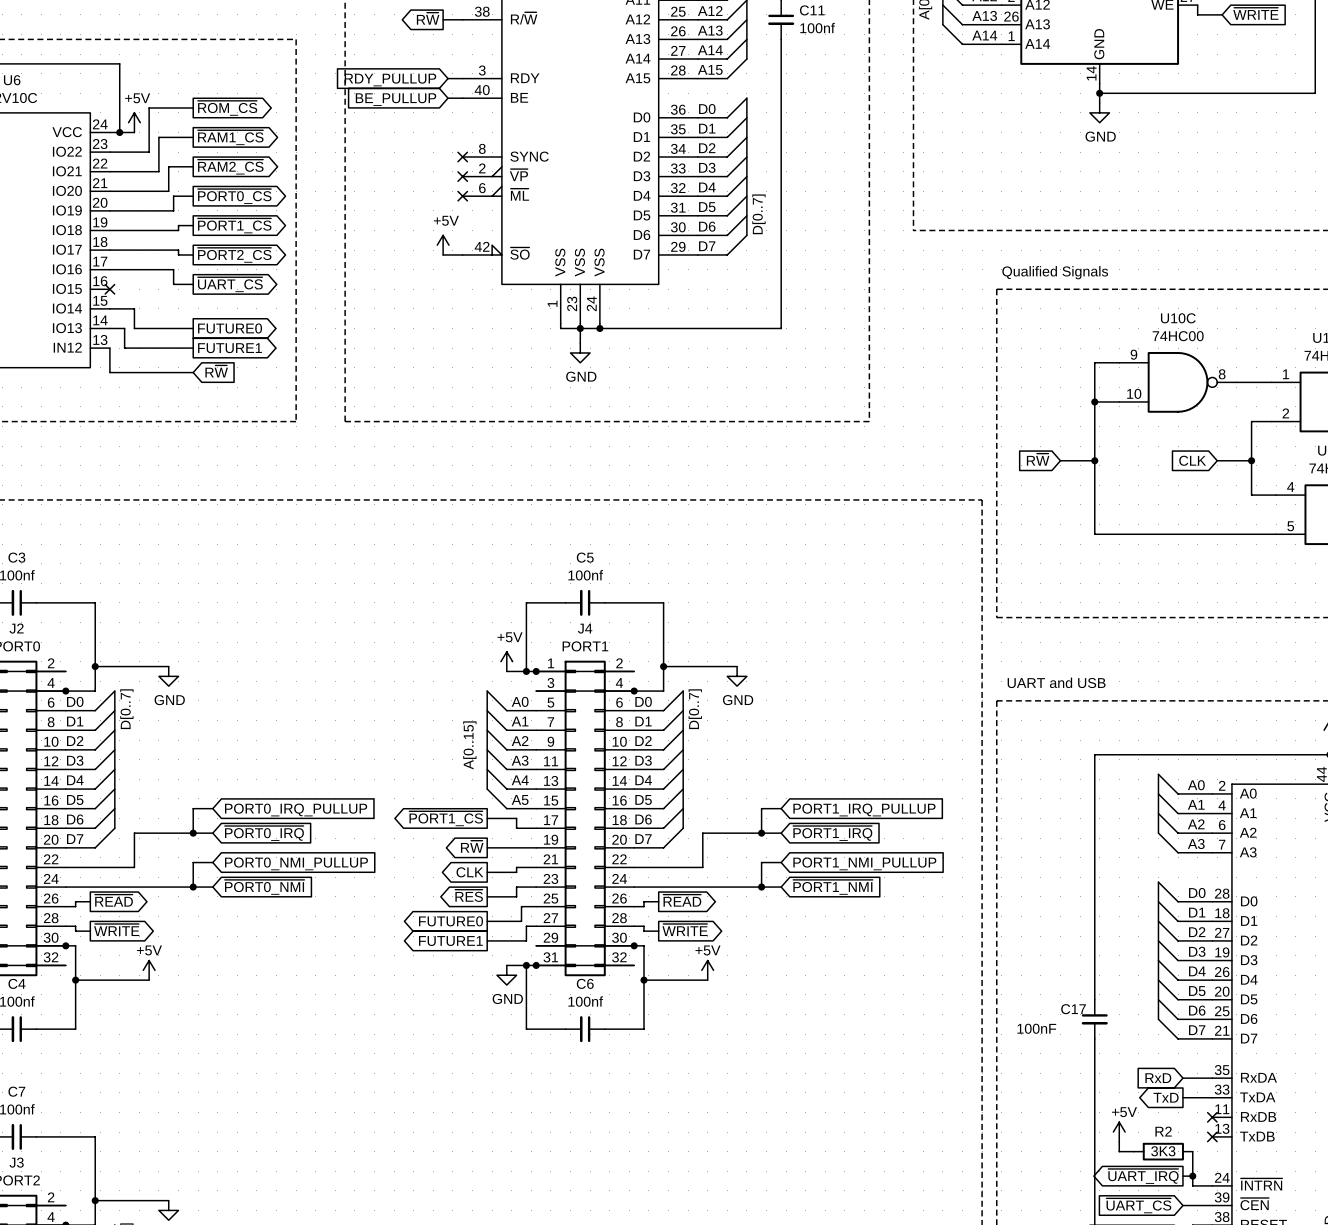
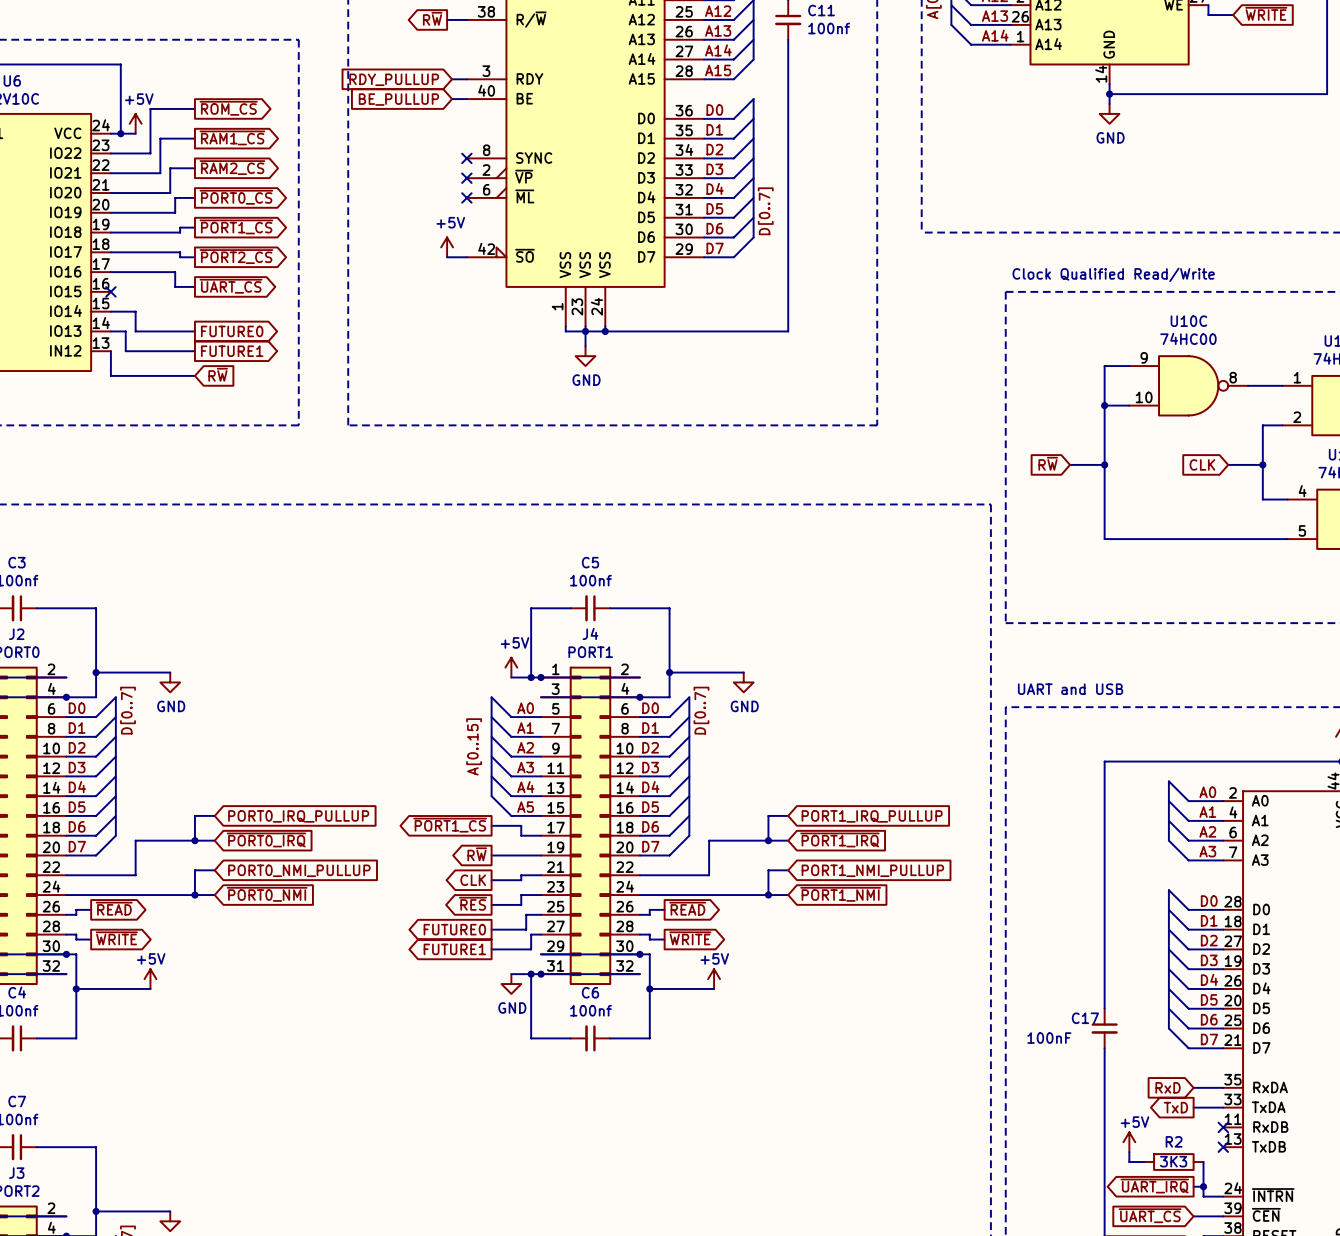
text: Qualified Signals (1055, 272) -> Clock Qualified Read/Write (1113, 274)

